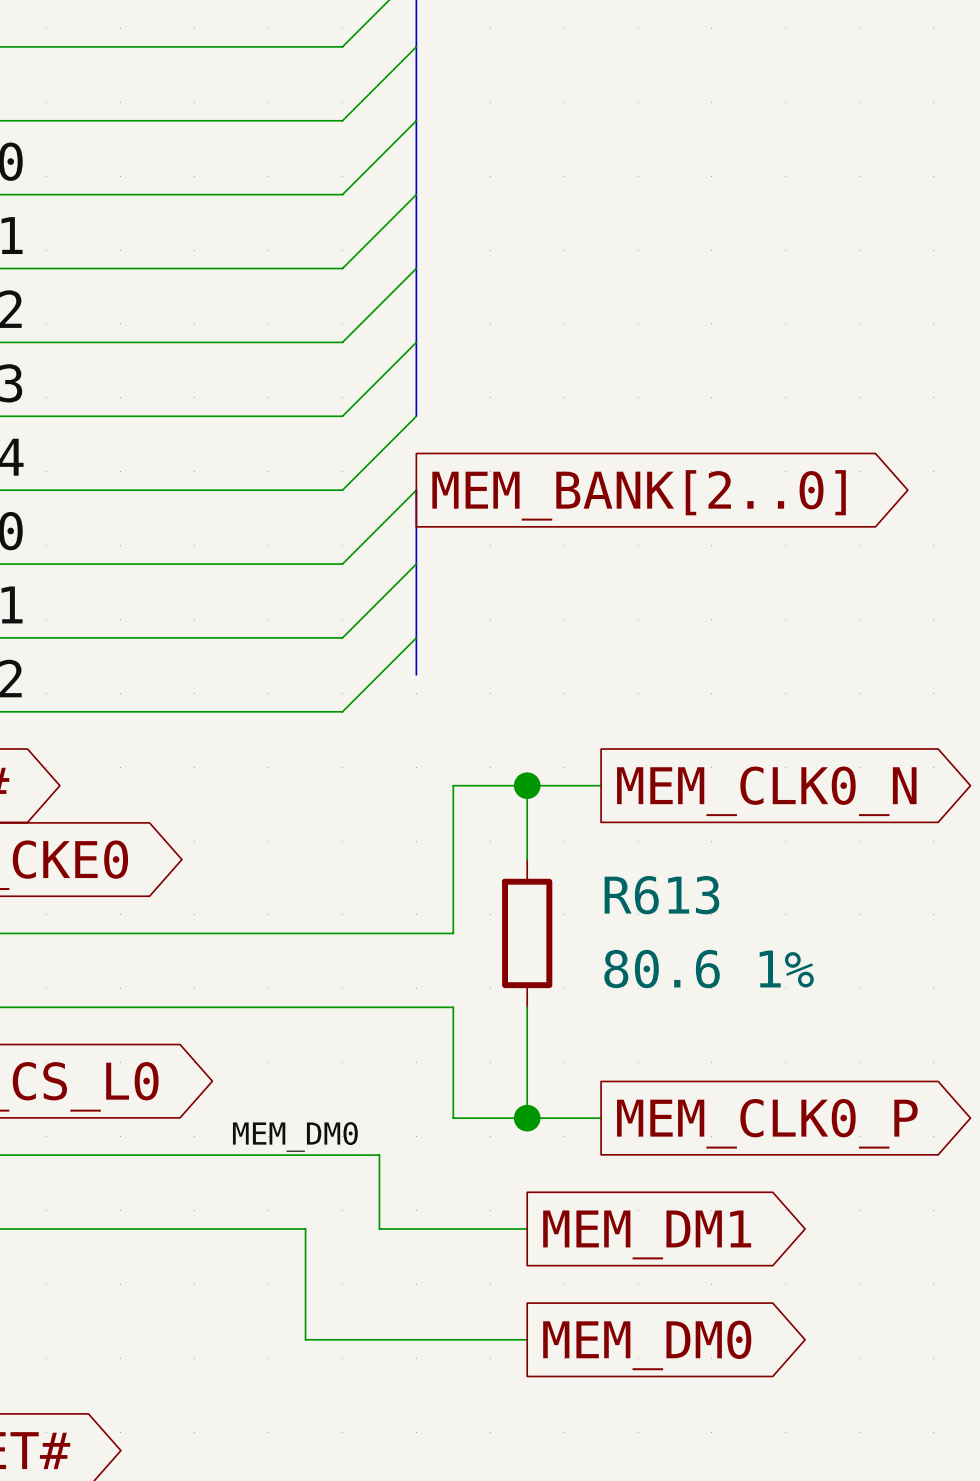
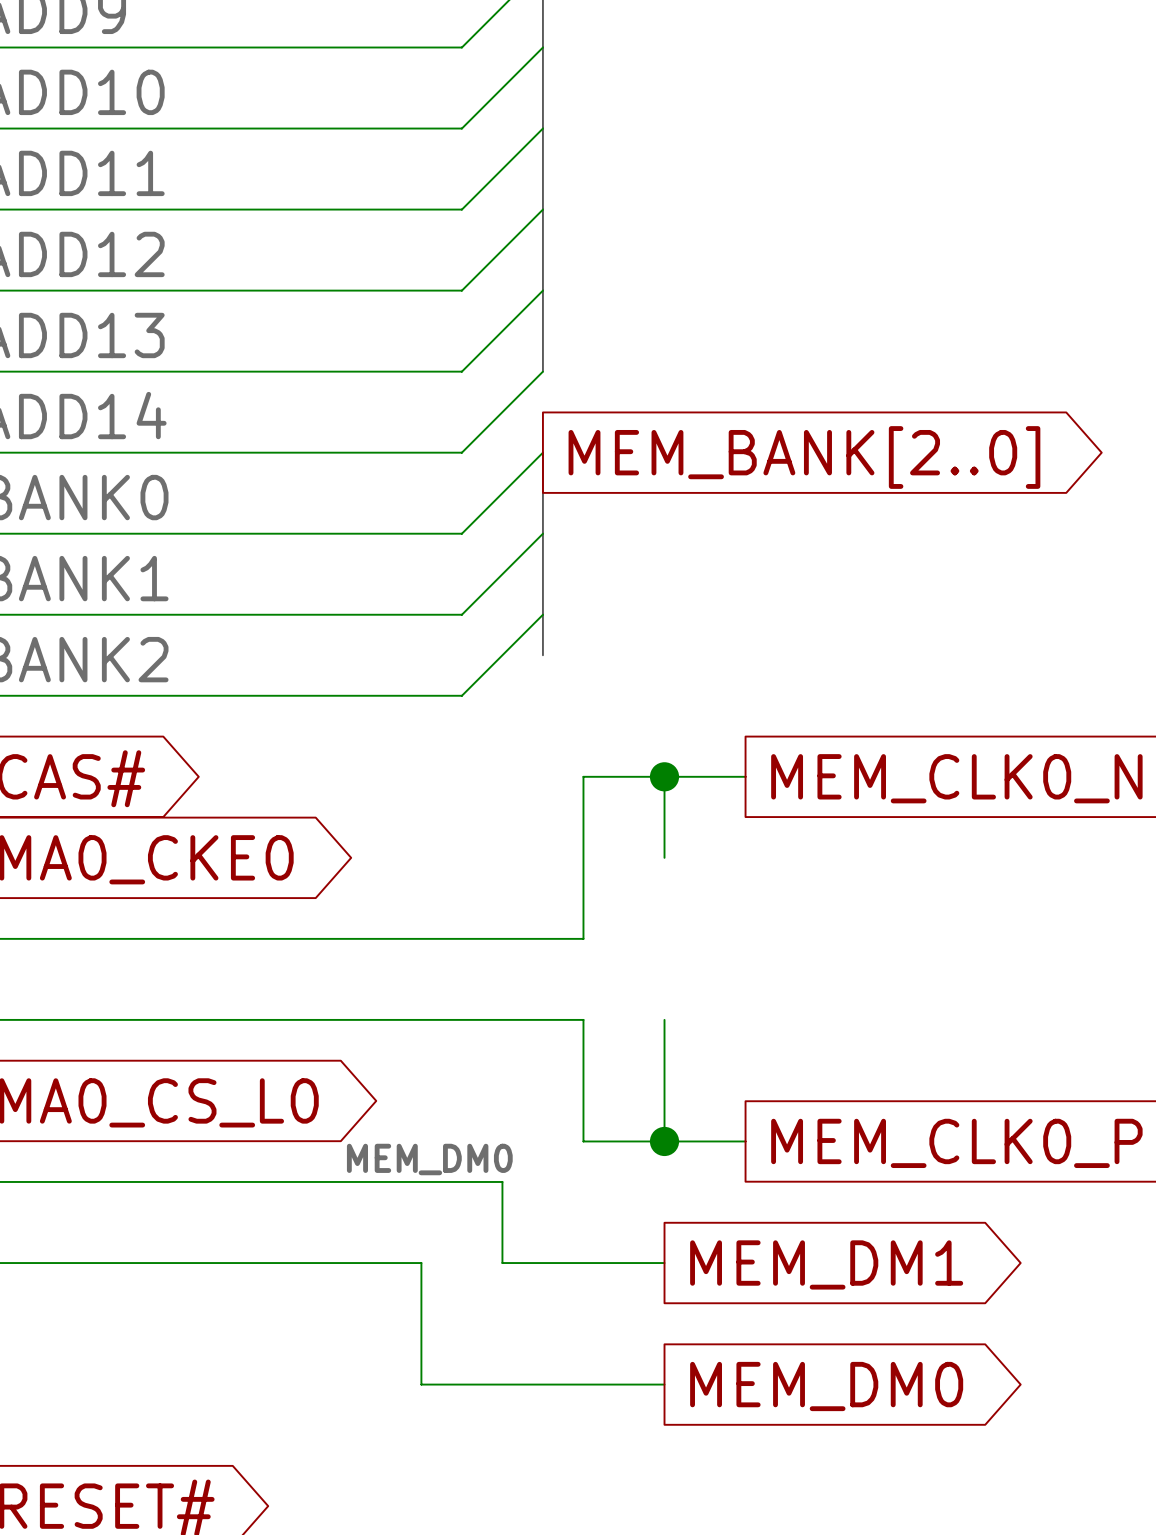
R613: 80.6 1% (527, 933) -> none

